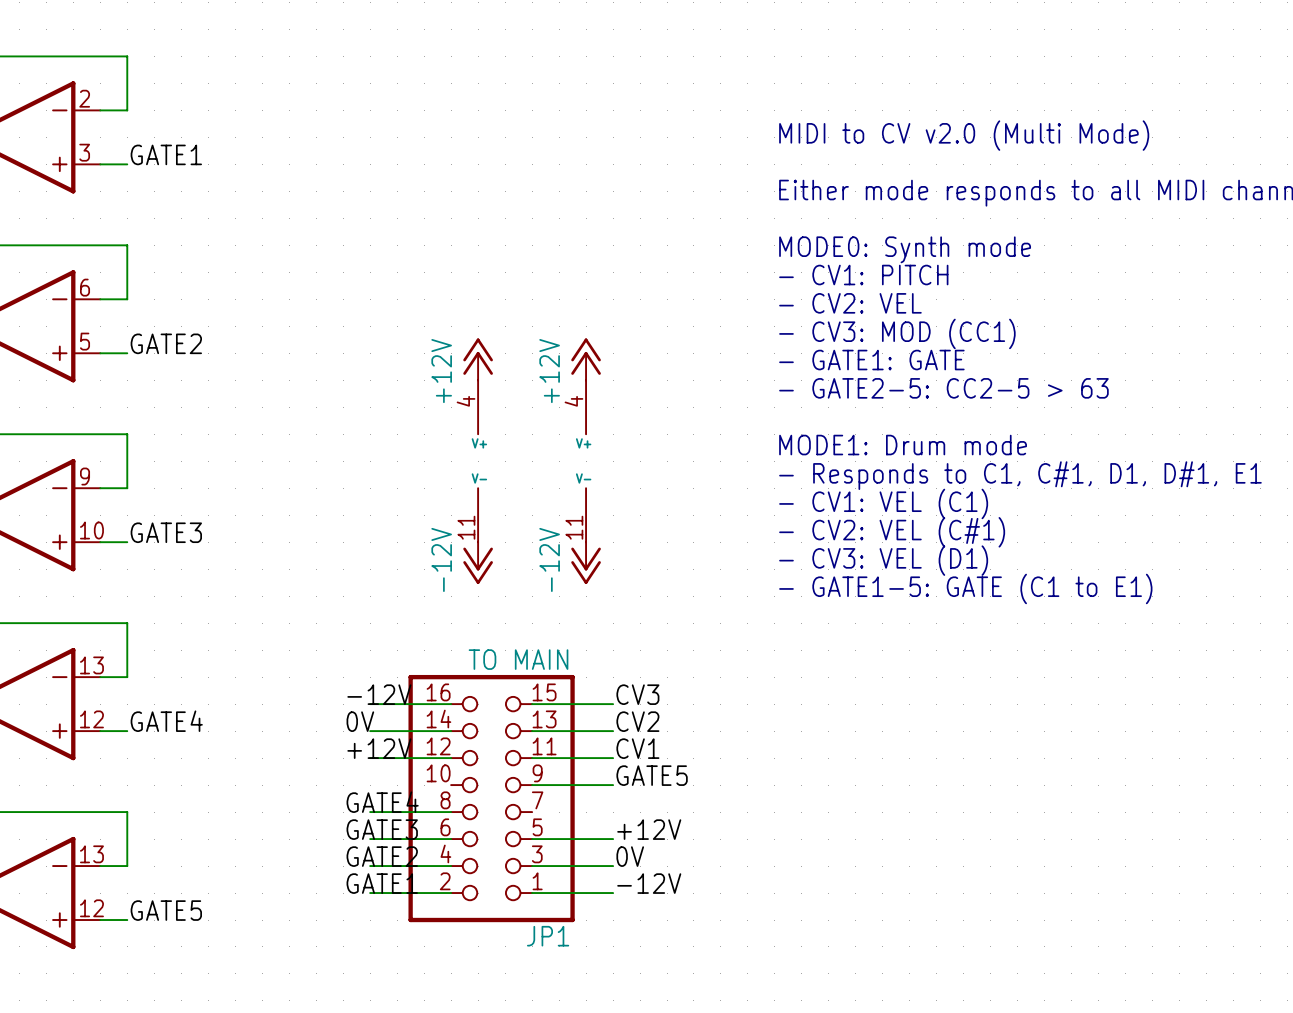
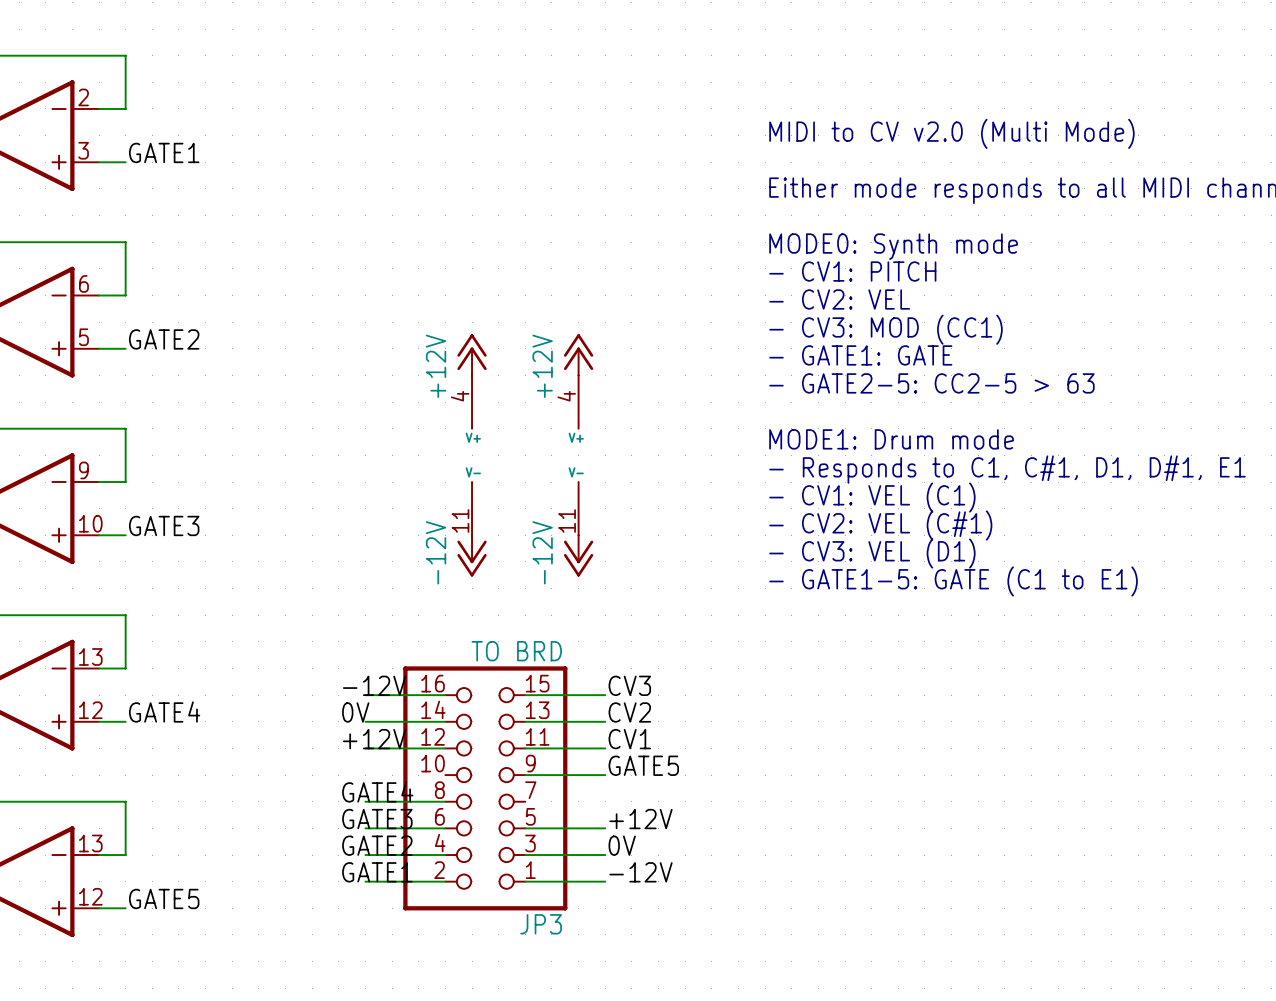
JP1 value: TO MAIN (518, 659) -> TO BRD (516, 651)
JP1 name: JP1 (548, 936) -> JP3 (541, 924)

